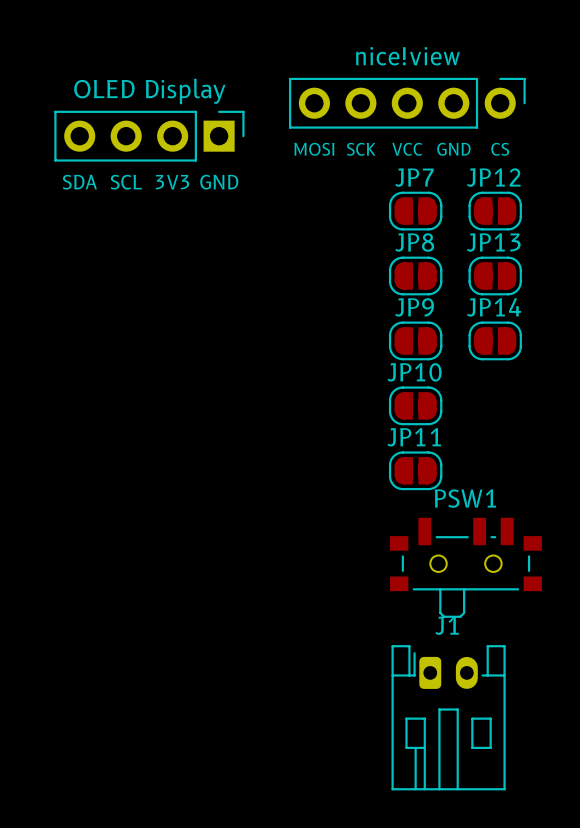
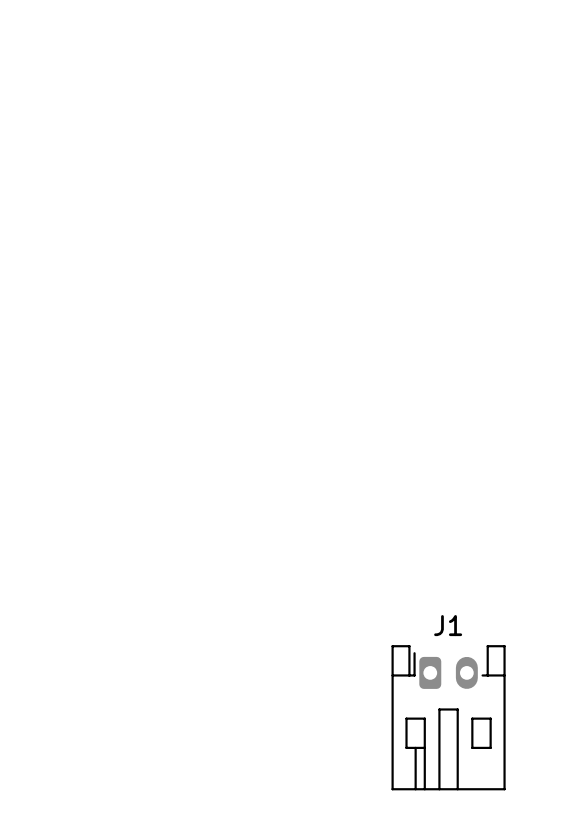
part: (407, 103) -> none
part: (149, 136) -> none
JP7: (415, 211) -> none
JP12: (495, 211) -> none
JP8: (415, 276) -> none
JP13: (495, 276) -> none
JP9: (415, 340) -> none
JP14: (495, 340) -> none
JP10: (415, 405) -> none
JP11: (415, 470) -> none
PSW1: (465, 567) -> none

